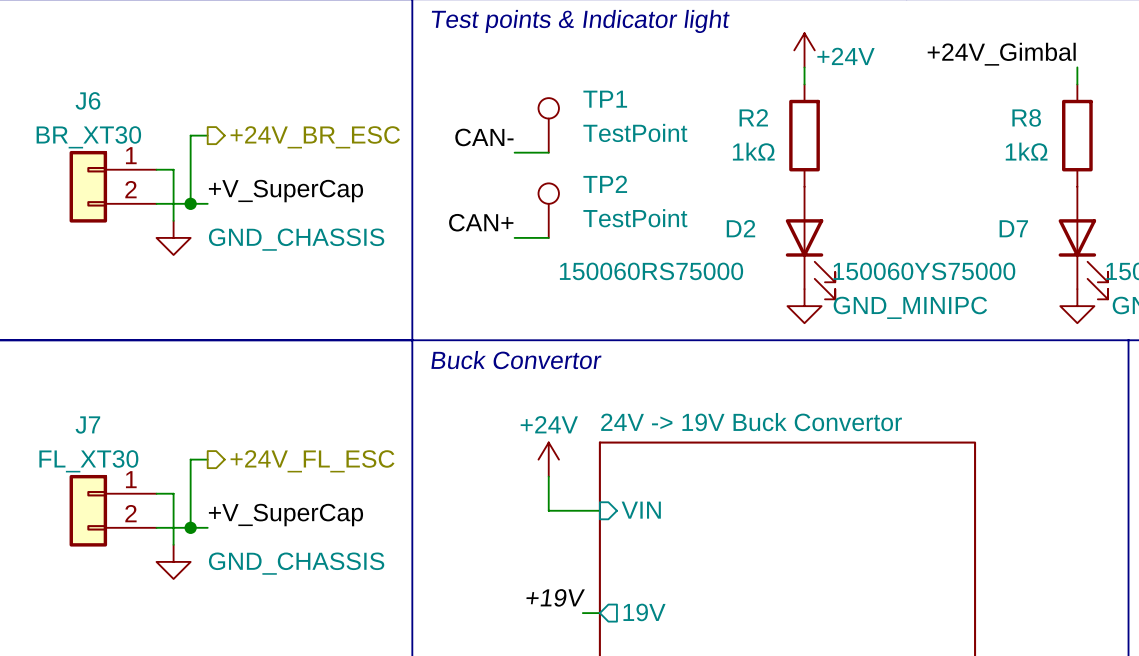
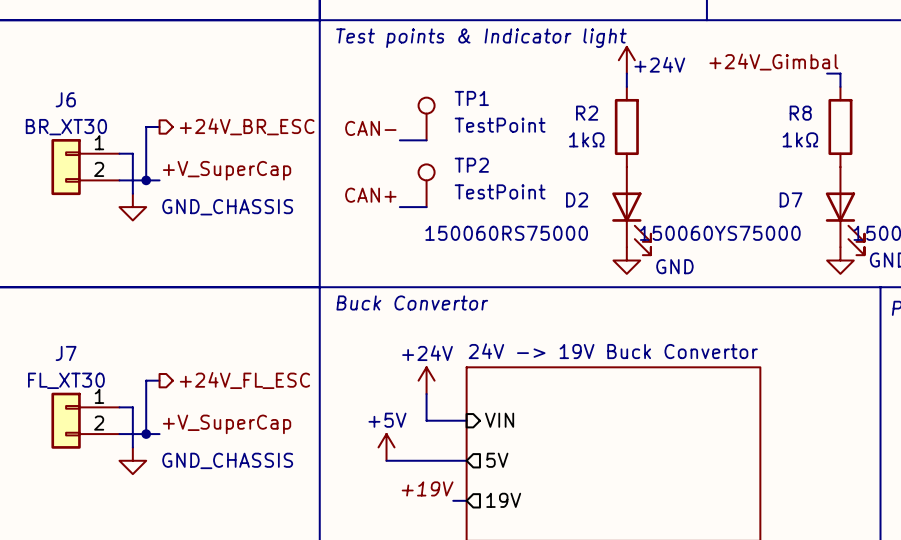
wire: none -> (827, 73) (840, 73)
power symbol: GND_MINIPC (804, 306) -> GND (626, 260)
power symbol: none -> +5V (386, 447)
wire: none -> (386, 460) (466, 460)
sheet pin: none -> 5V (497, 460)

